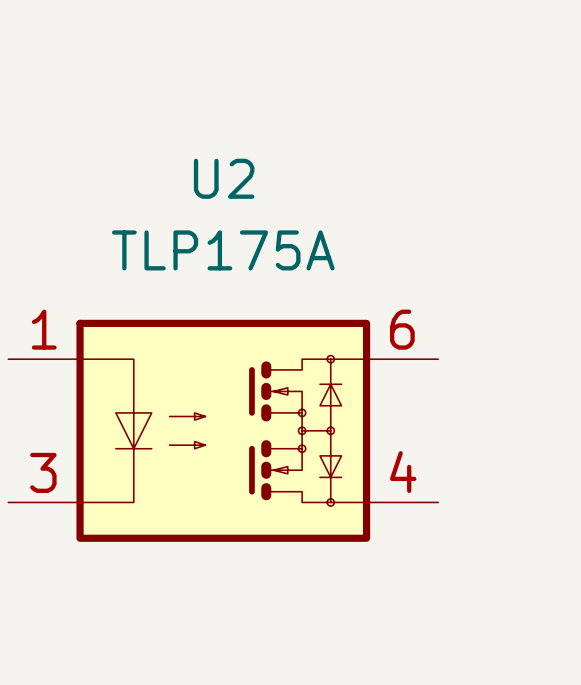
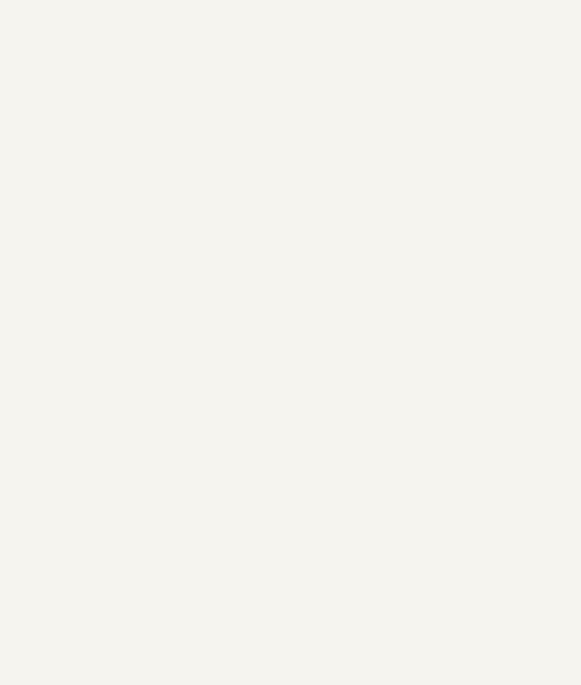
U2: TLP175A (223, 430) -> none

